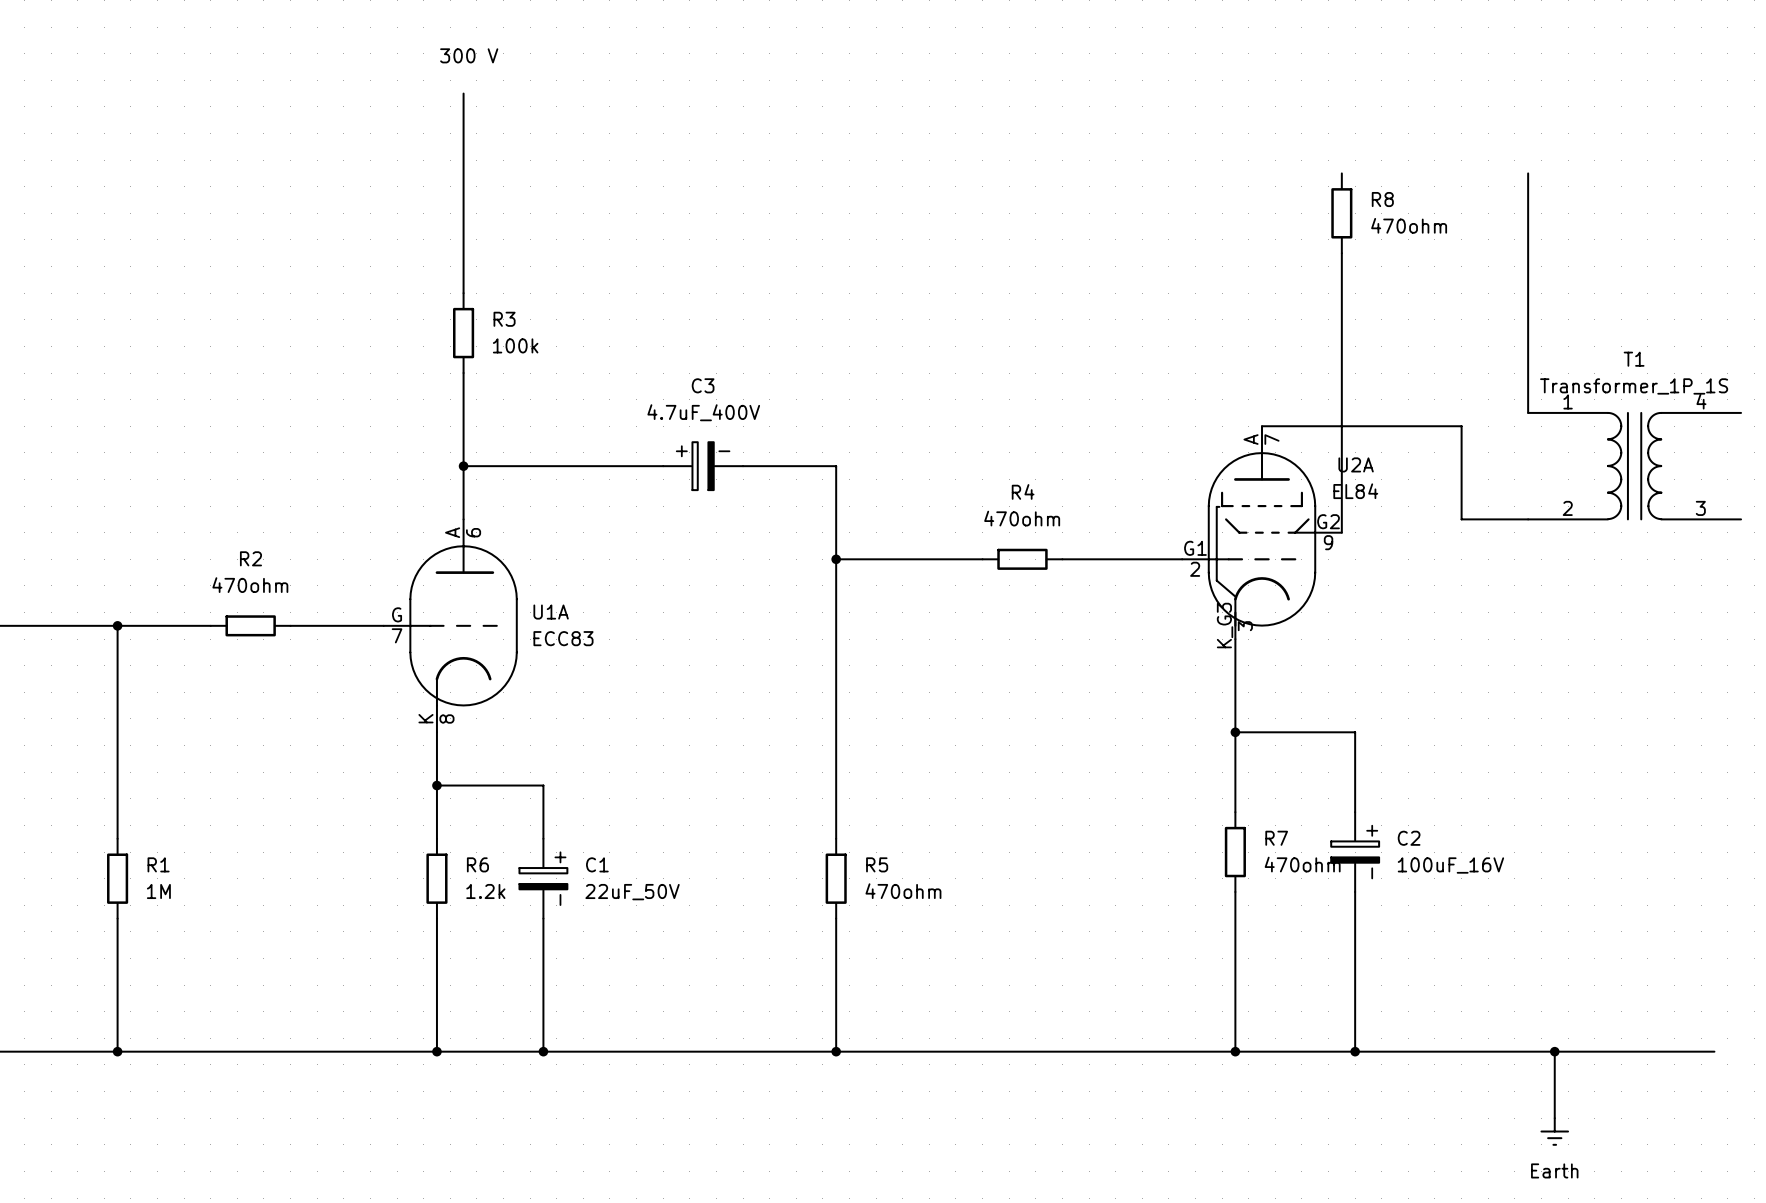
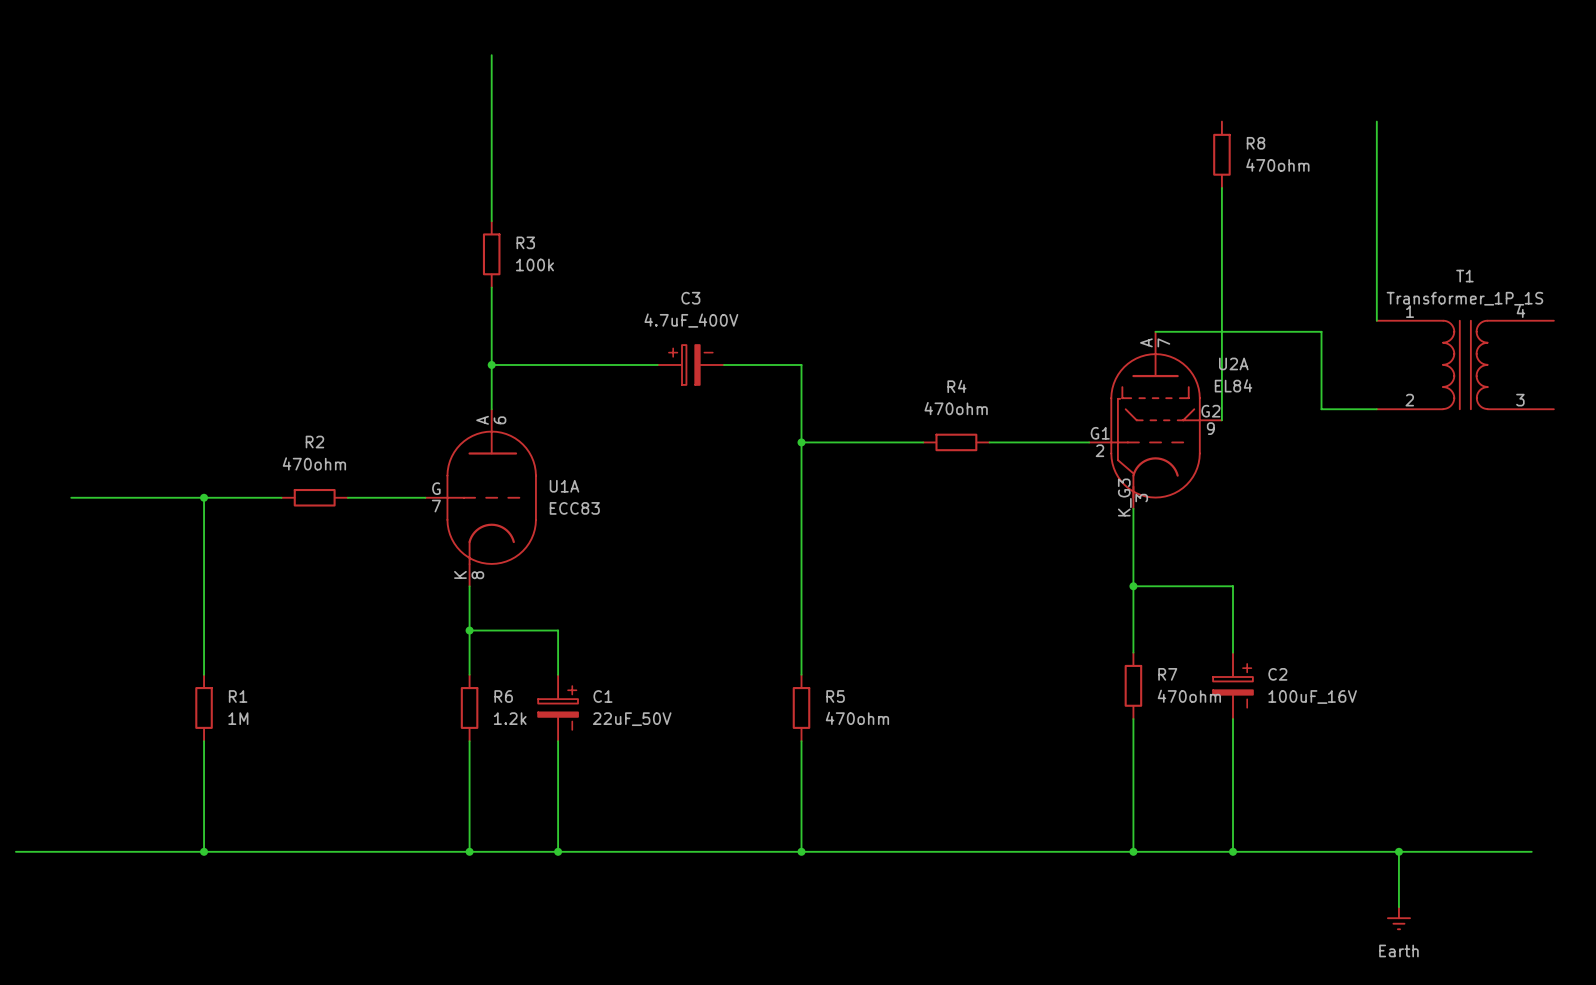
text: 300 V (469, 55) -> none

